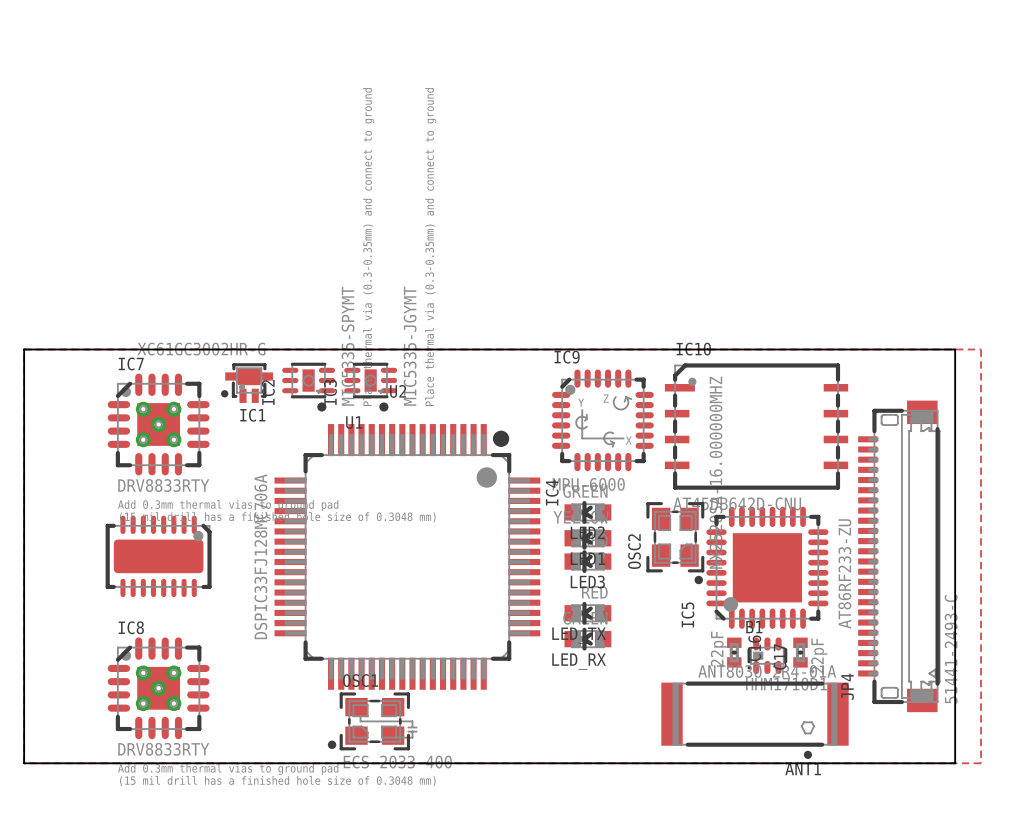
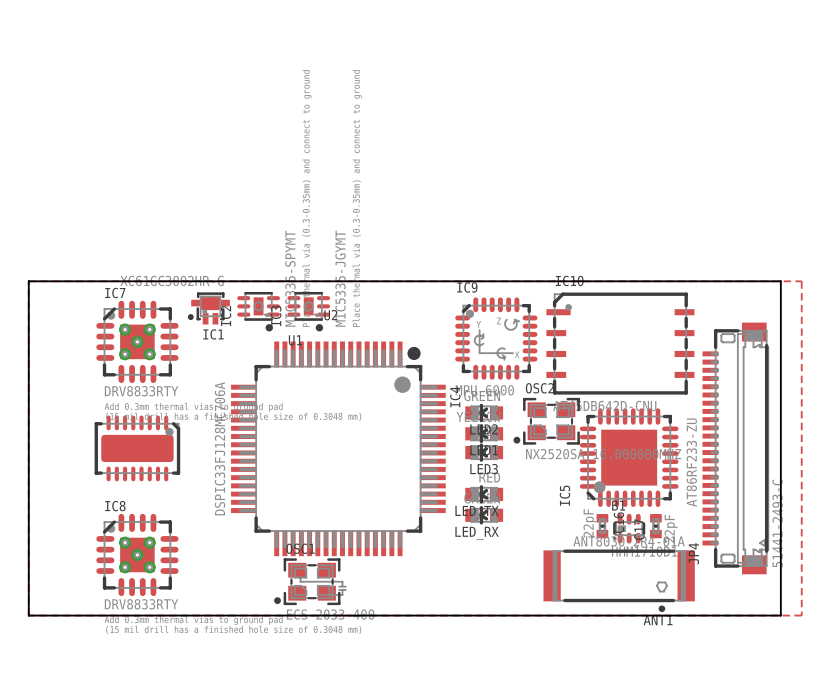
OSC2 rotation: 0° (675, 543) -> 90° clockwise (546, 421)

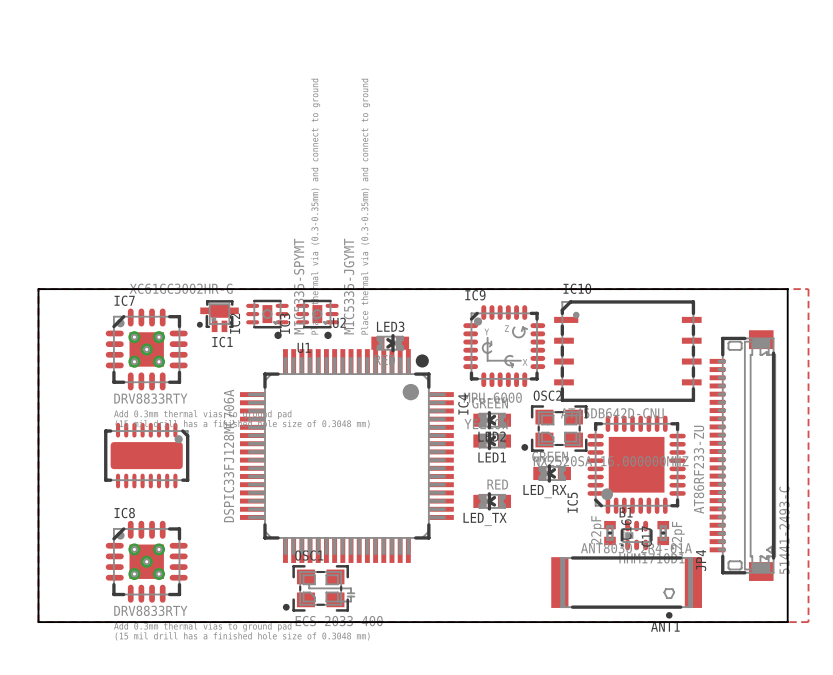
LED3 rotation: 0° (484, 452) -> 180° (390, 343)
LED3 position: (484, 452) -> (390, 343)
LED_RX position: (484, 515) -> (552, 473)

